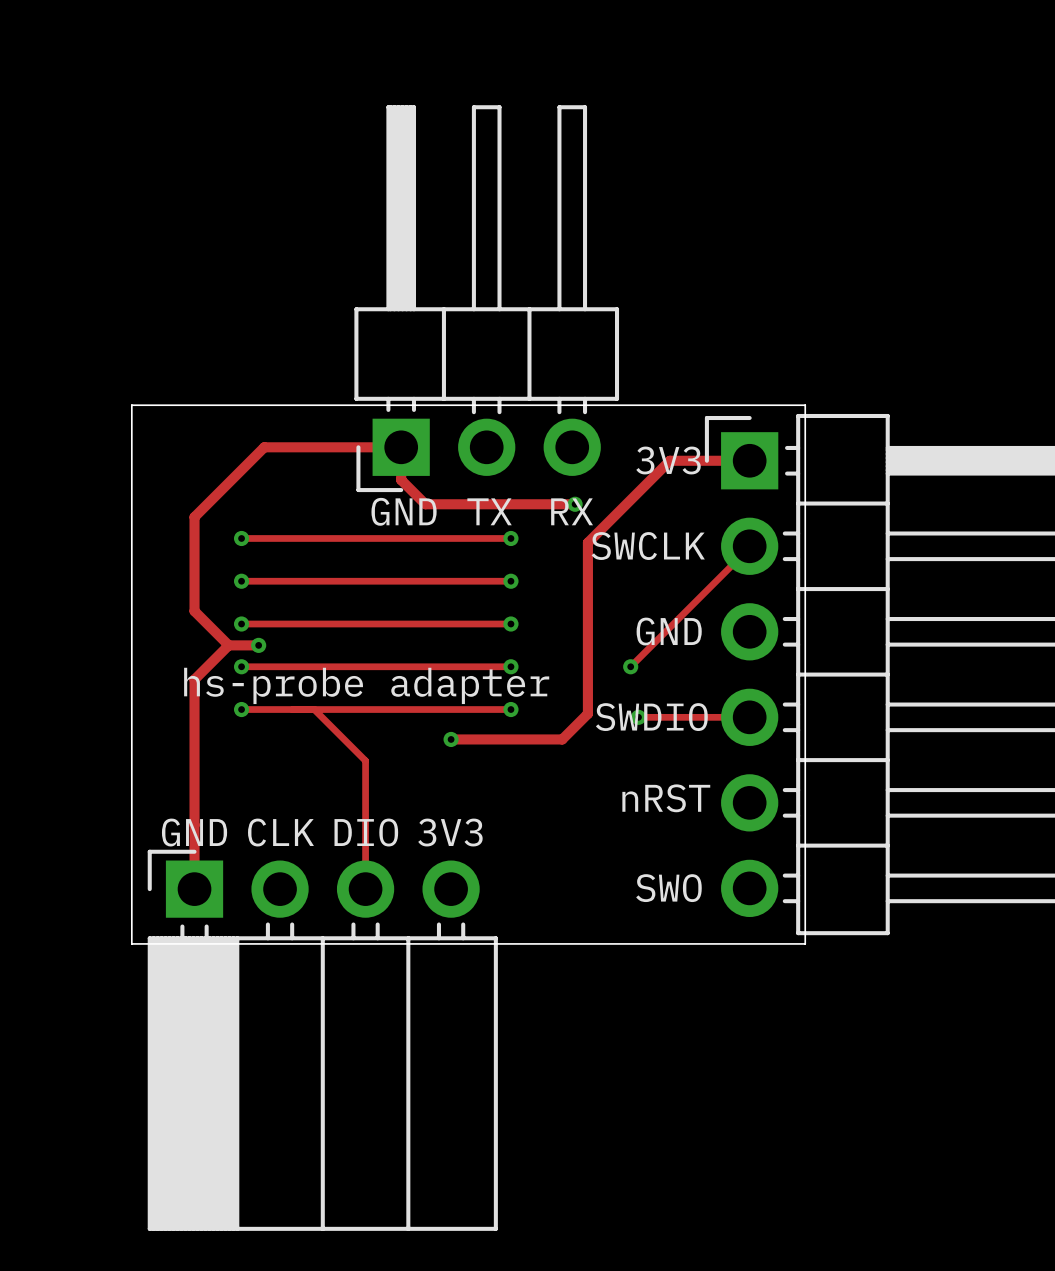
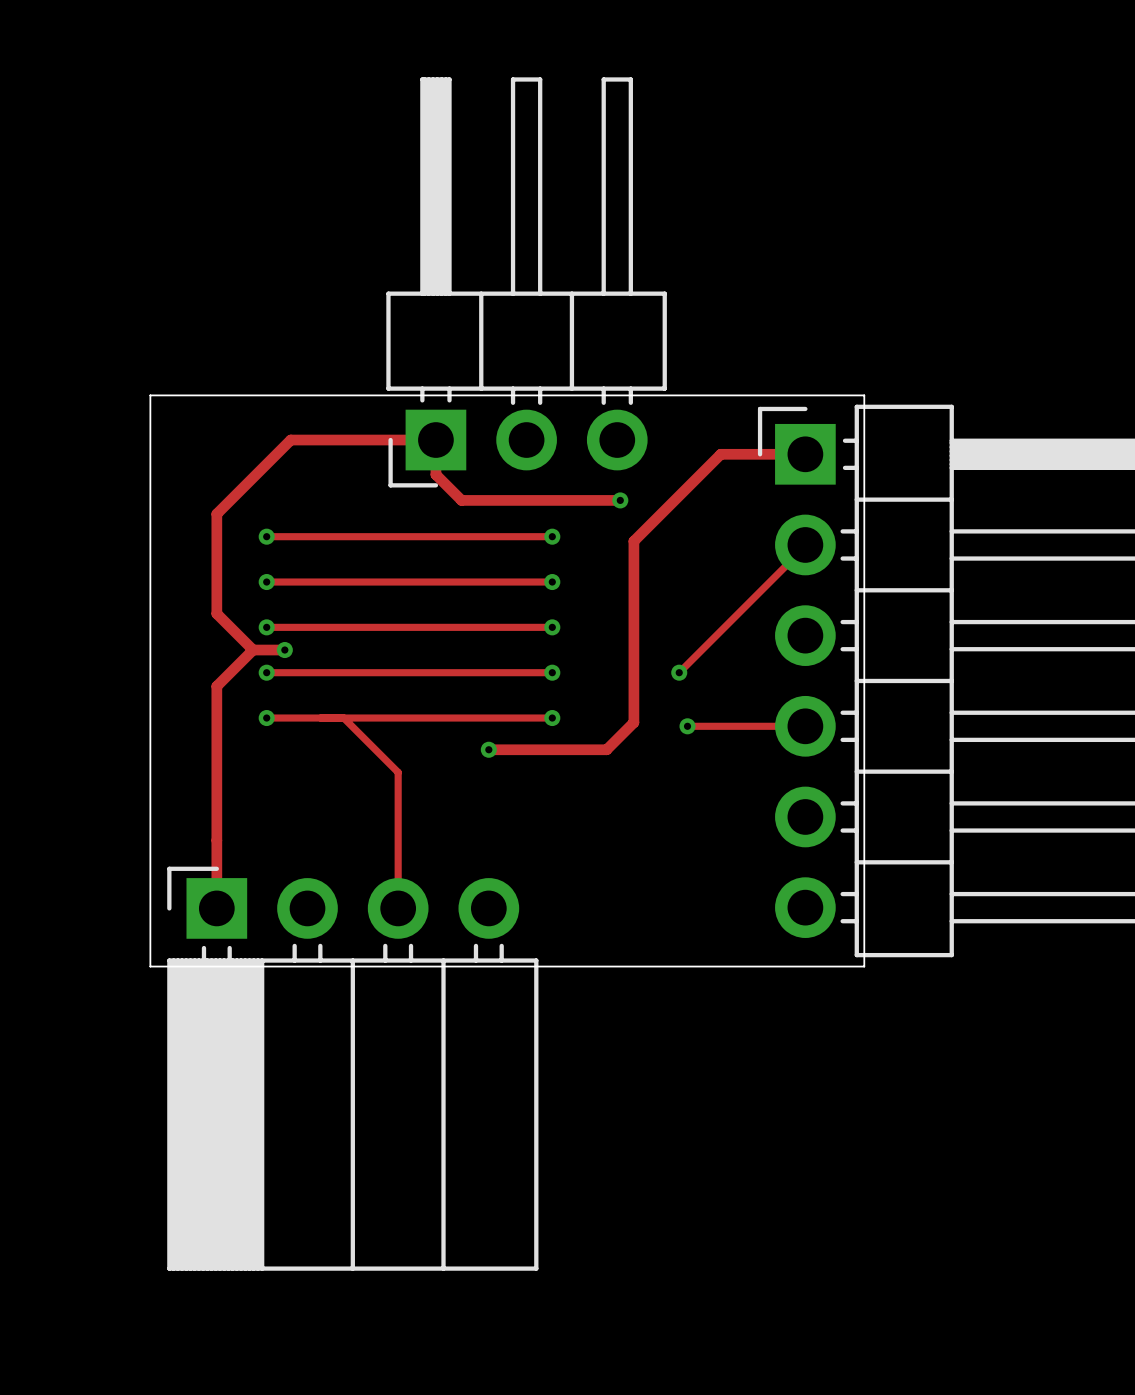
text: 3V3 (668, 460) -> none
text: GND (404, 511) -> none
text: TX (489, 511) -> none
text: RX (572, 511) -> none
text: SWCLK (648, 546) -> none
text: GND (669, 631) -> none
text: hs-probe adapter (366, 685) -> none
text: SWDIO (651, 717) -> none
text: nRST (666, 798) -> none
text: GND (194, 832) -> none
text: CLK (280, 832) -> none
text: DIO (366, 832) -> none
text: 3V3 (450, 832) -> none
text: SWO (668, 888) -> none

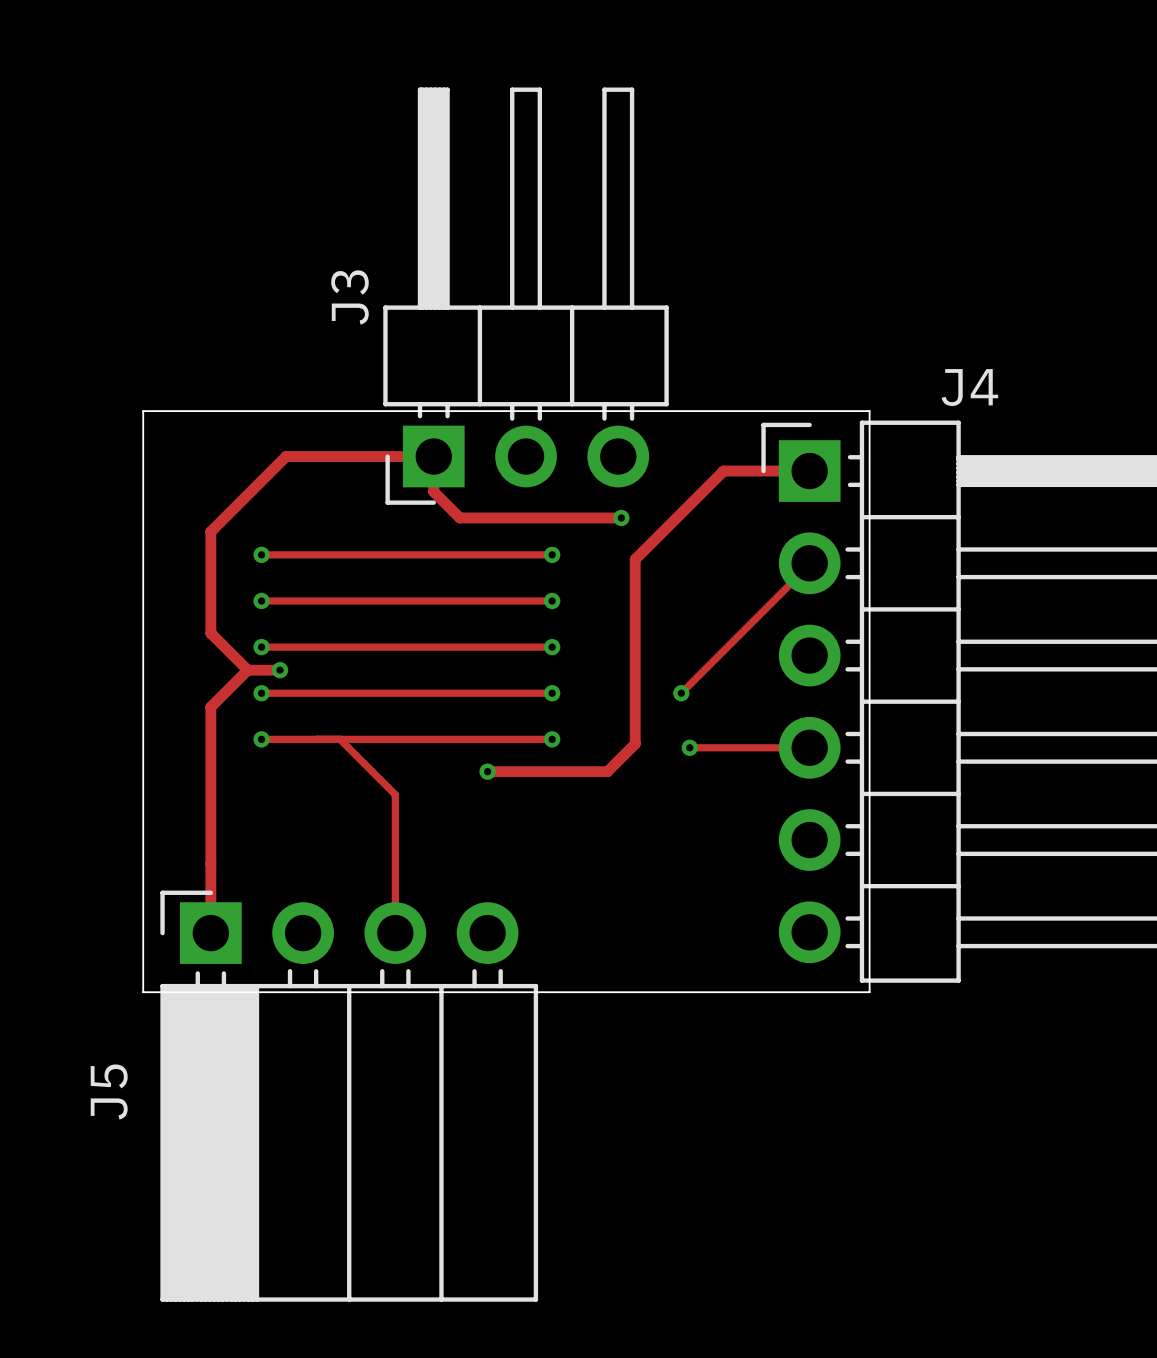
J3 name: none -> J3 (349, 297)
J4 name: none -> J4 (969, 387)
J5 name: none -> J5 (109, 1091)

